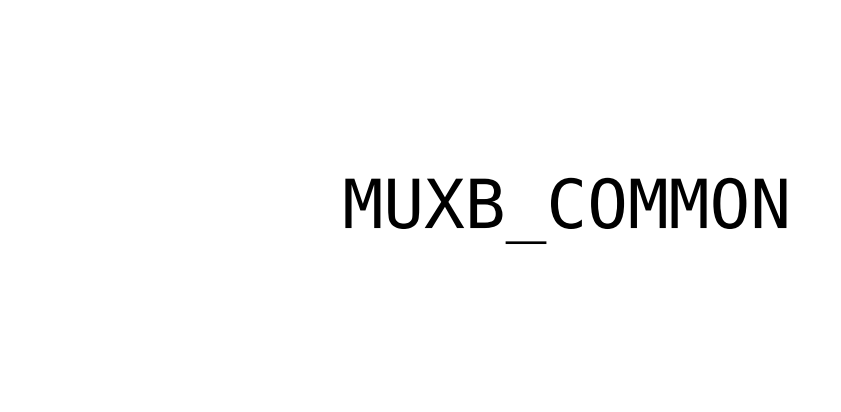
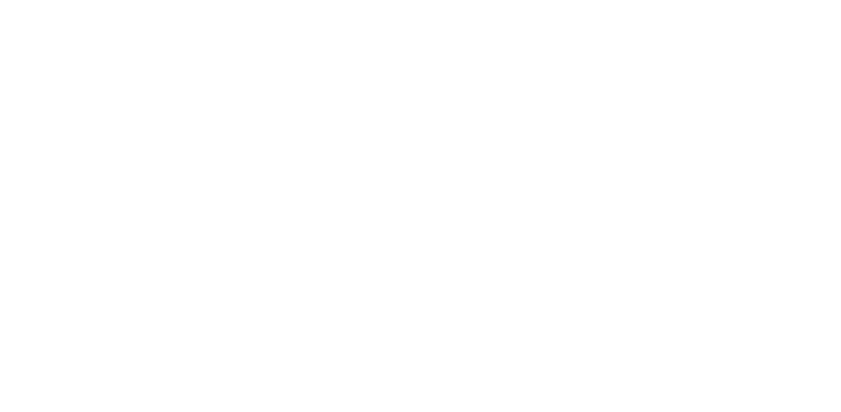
label: MUXB_COMMON (565, 210) -> none

